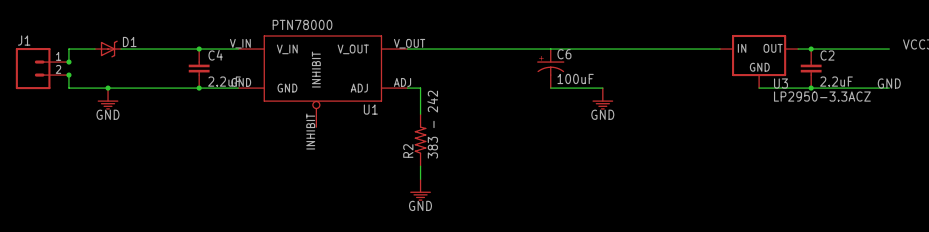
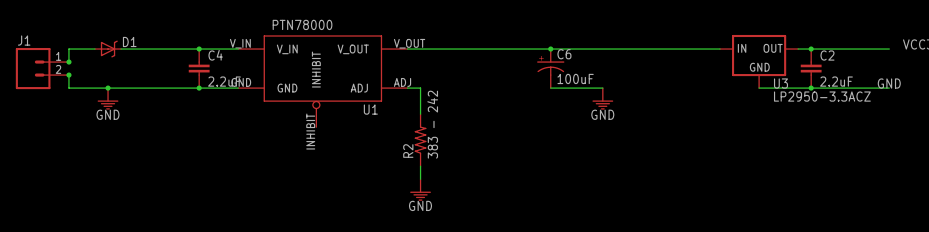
junction: none -> (550, 49)

